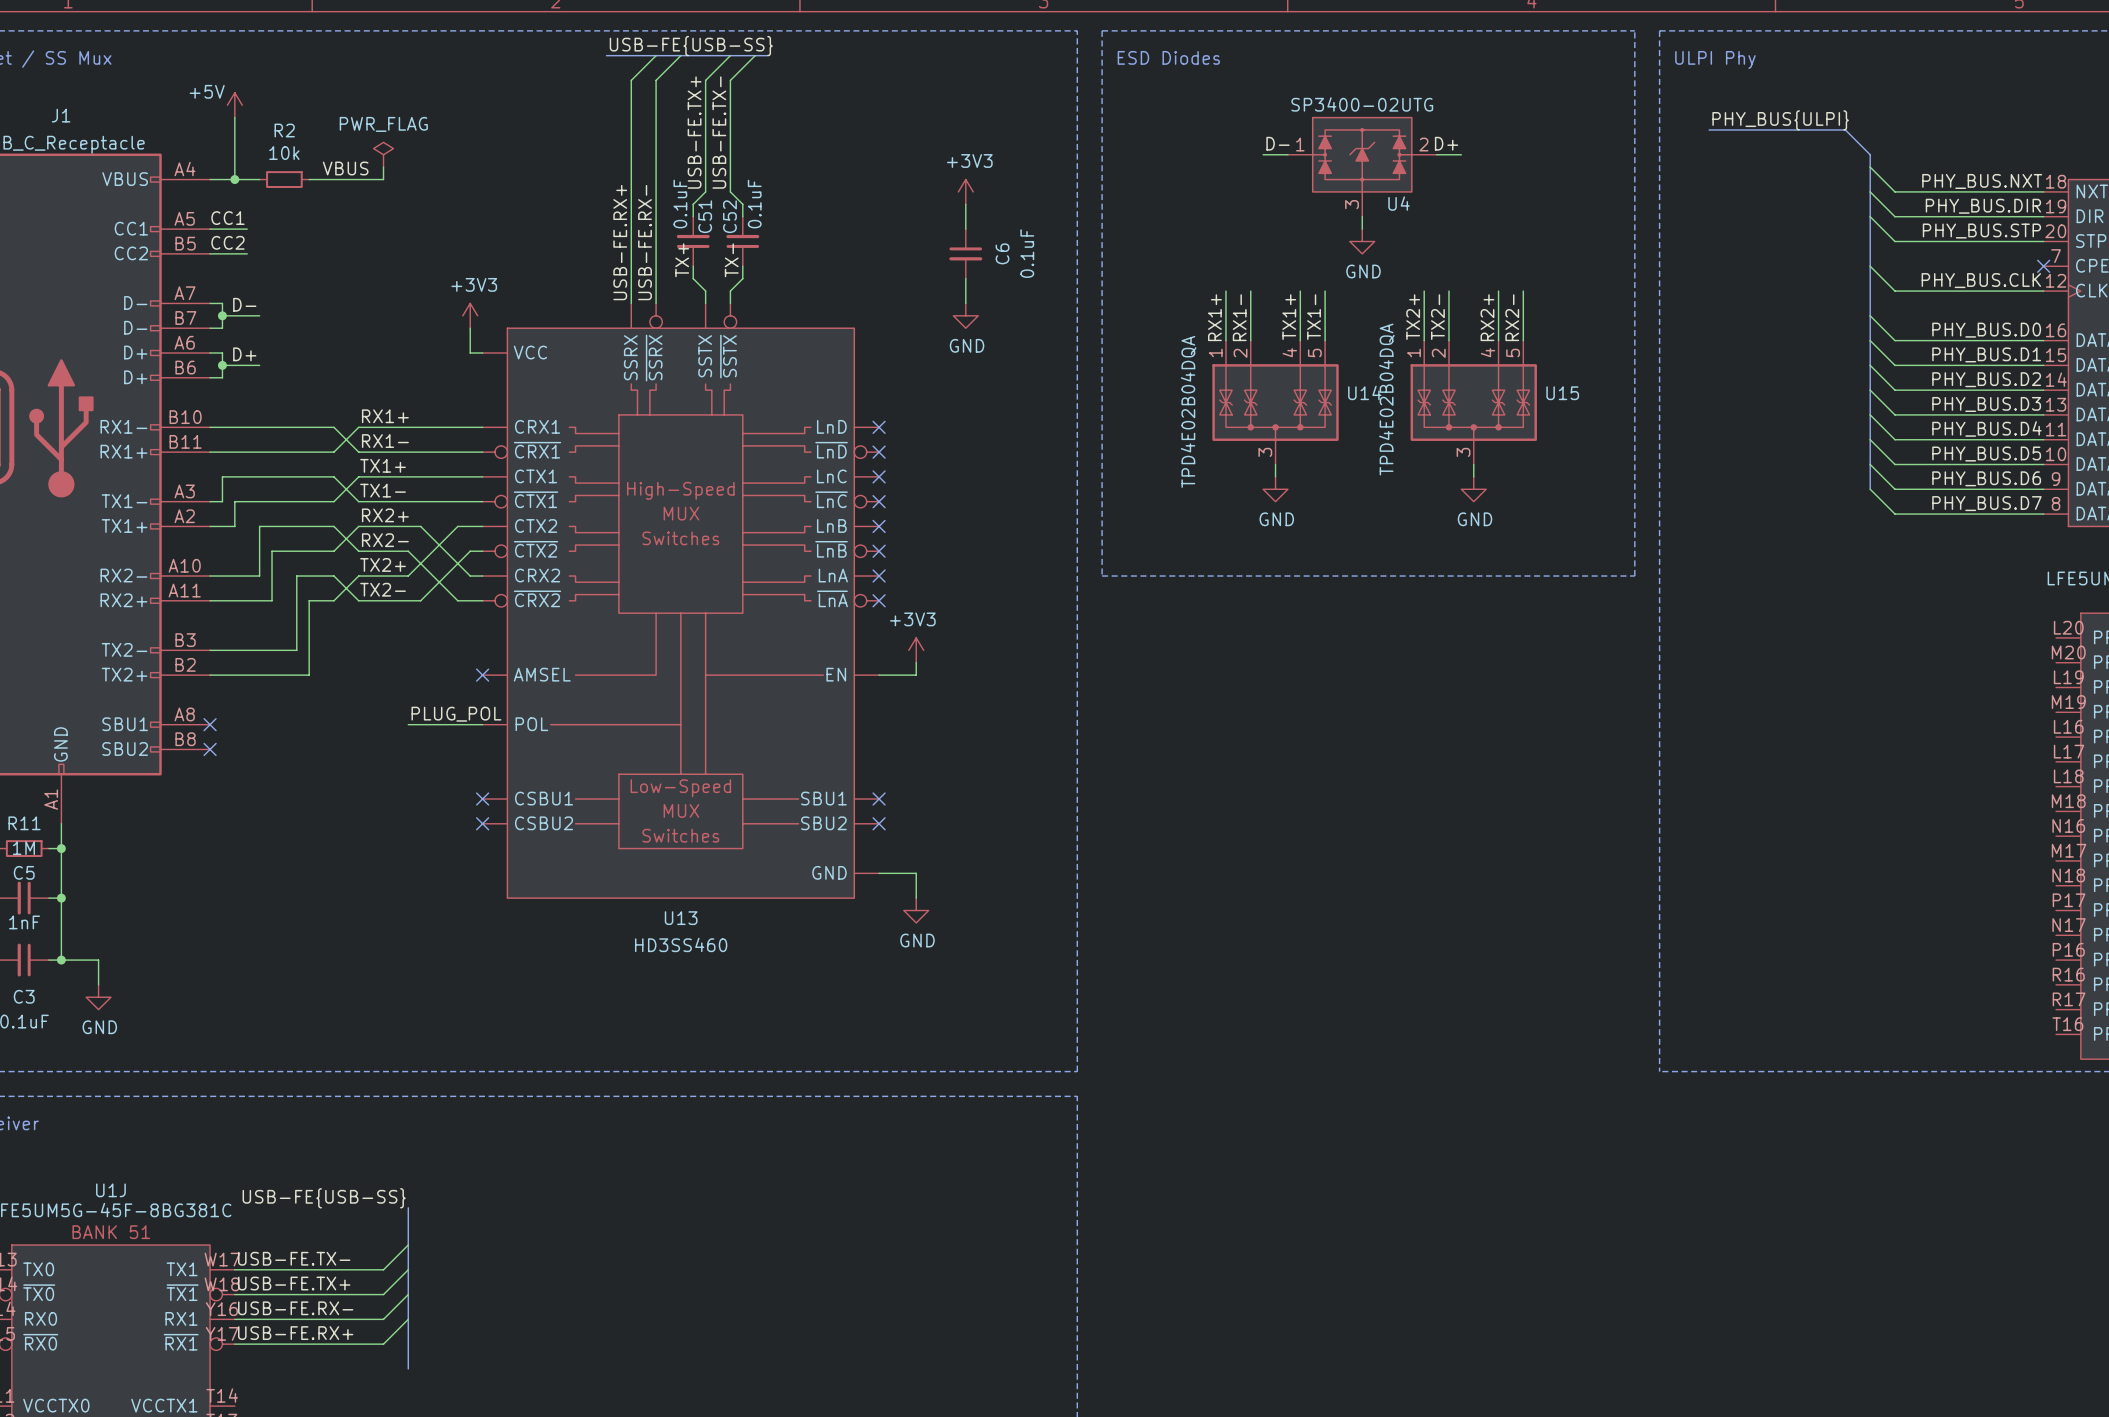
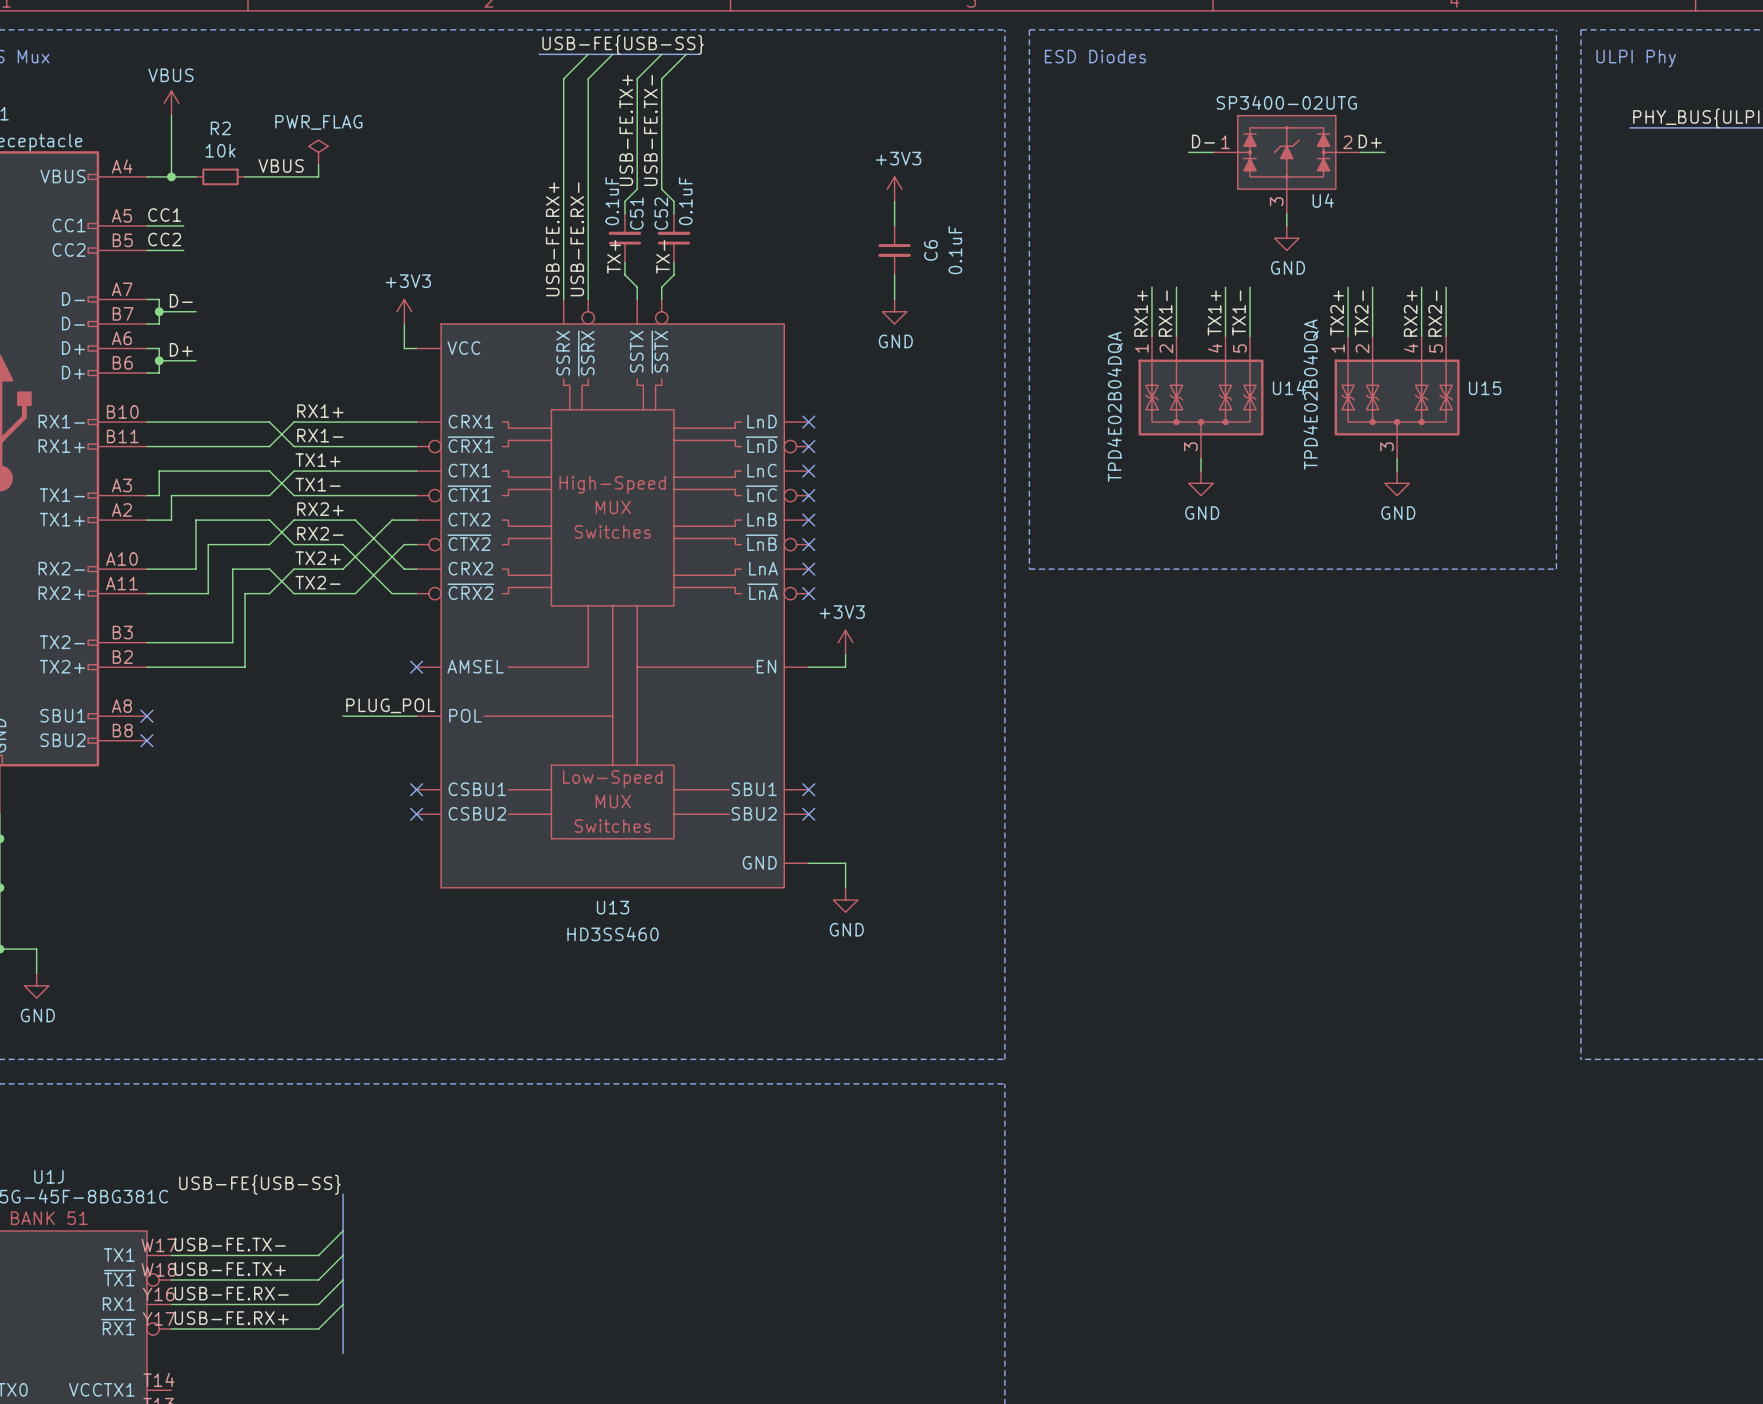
power symbol: +5V (234, 105) -> VBUS (171, 103)

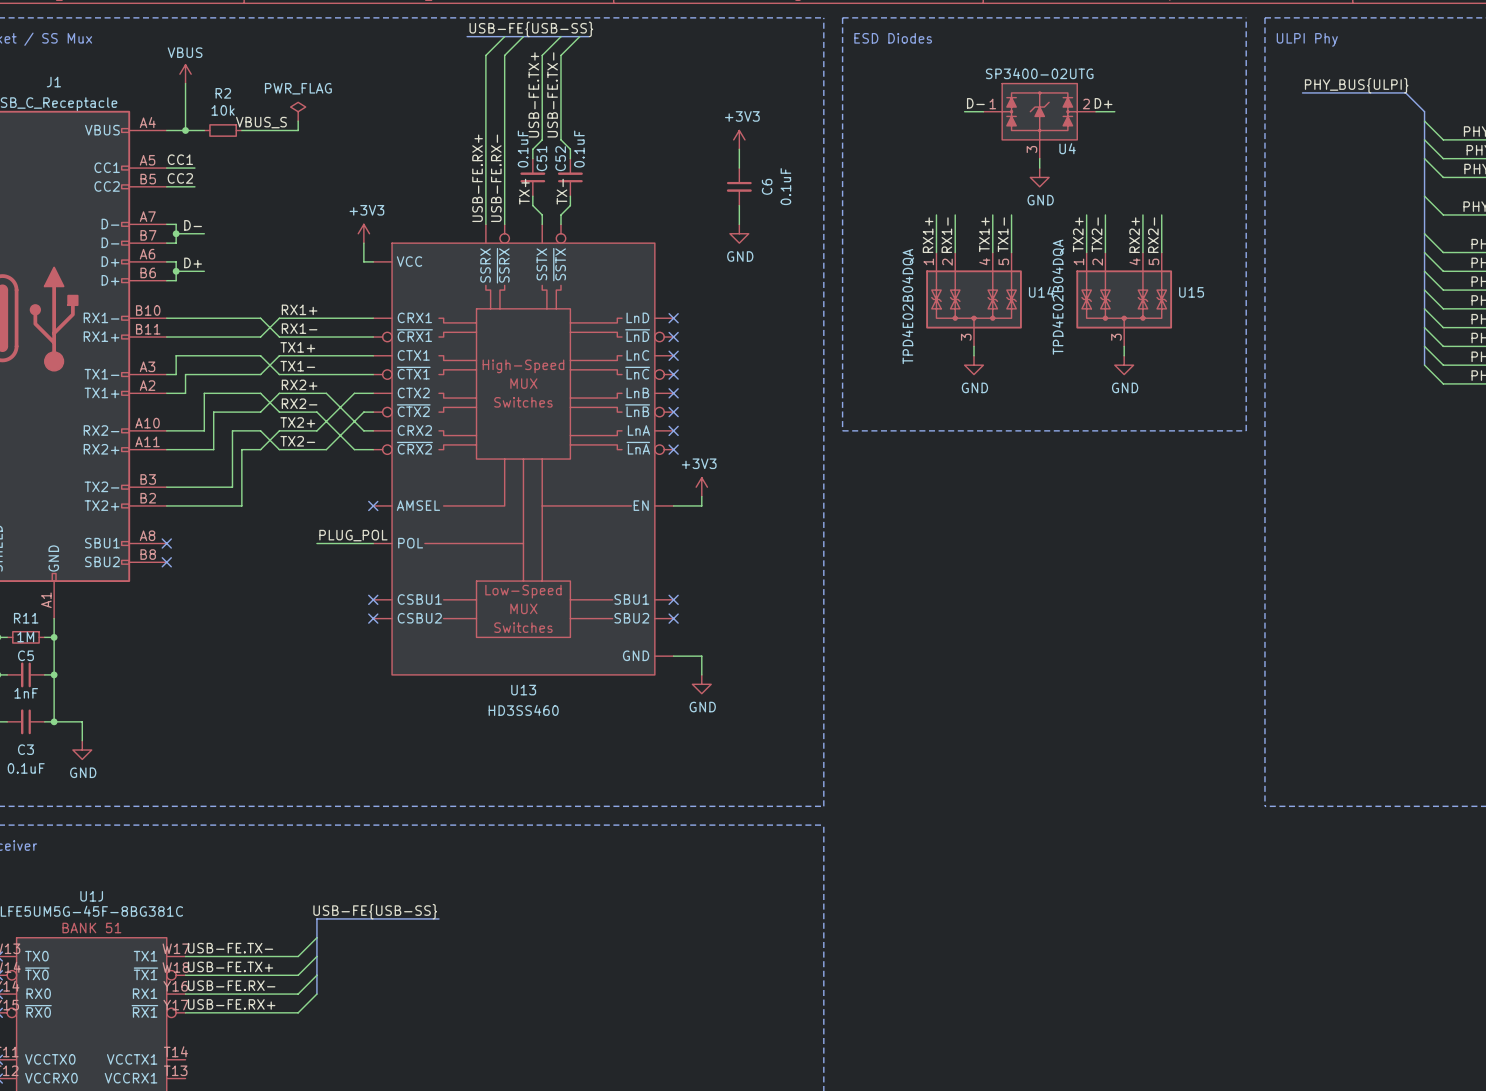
label: VBUS (281, 165) -> VBUS_S (261, 122)
label position: USB-FE{USB-SS} (259, 1184) -> USB-FE{USB-SS} (375, 911)
bus: (343, 1194) (343, 1206) -> (438, 918) (316, 918)
bus: (343, 1304) (343, 1353) -> none

